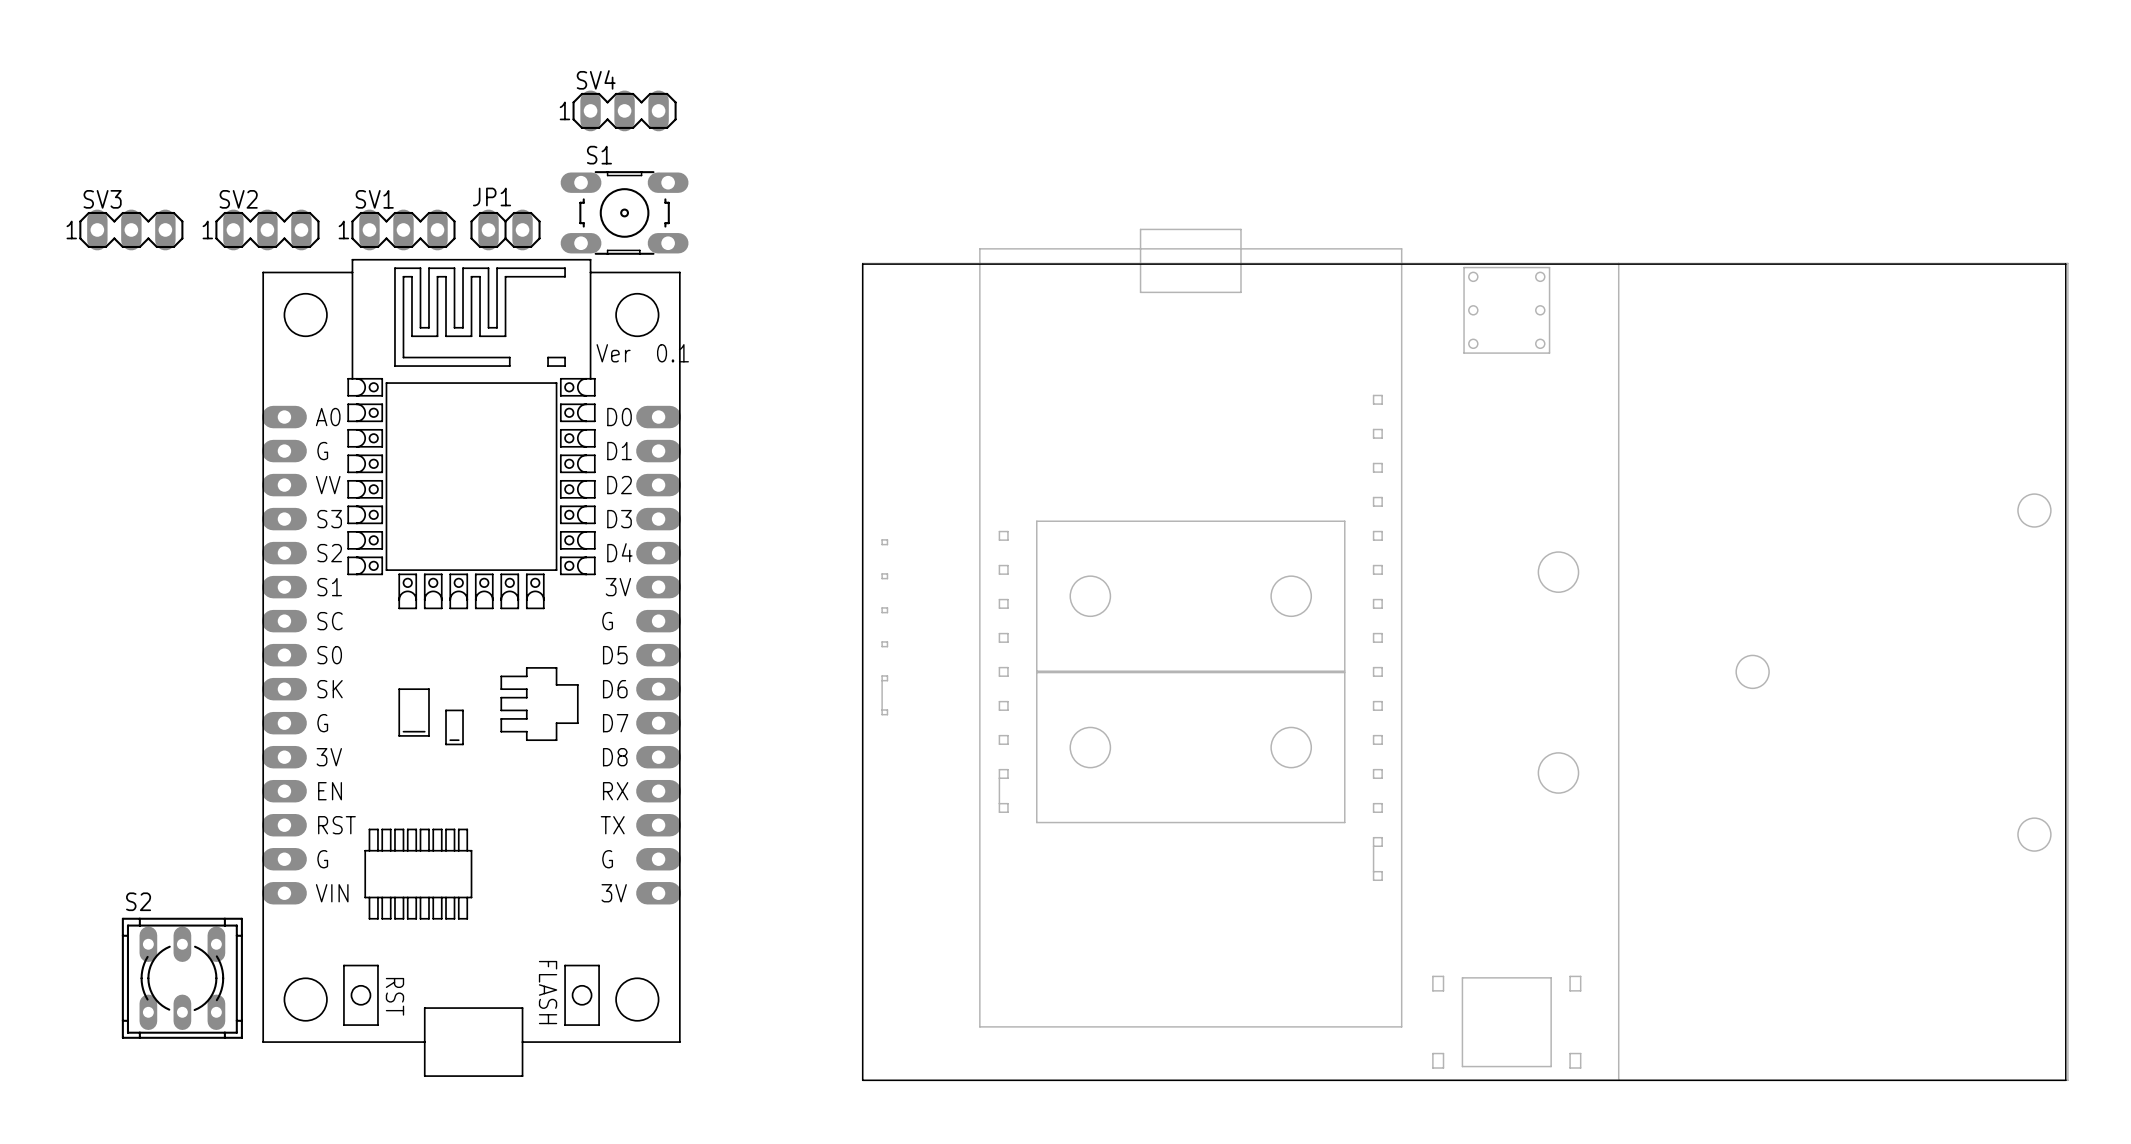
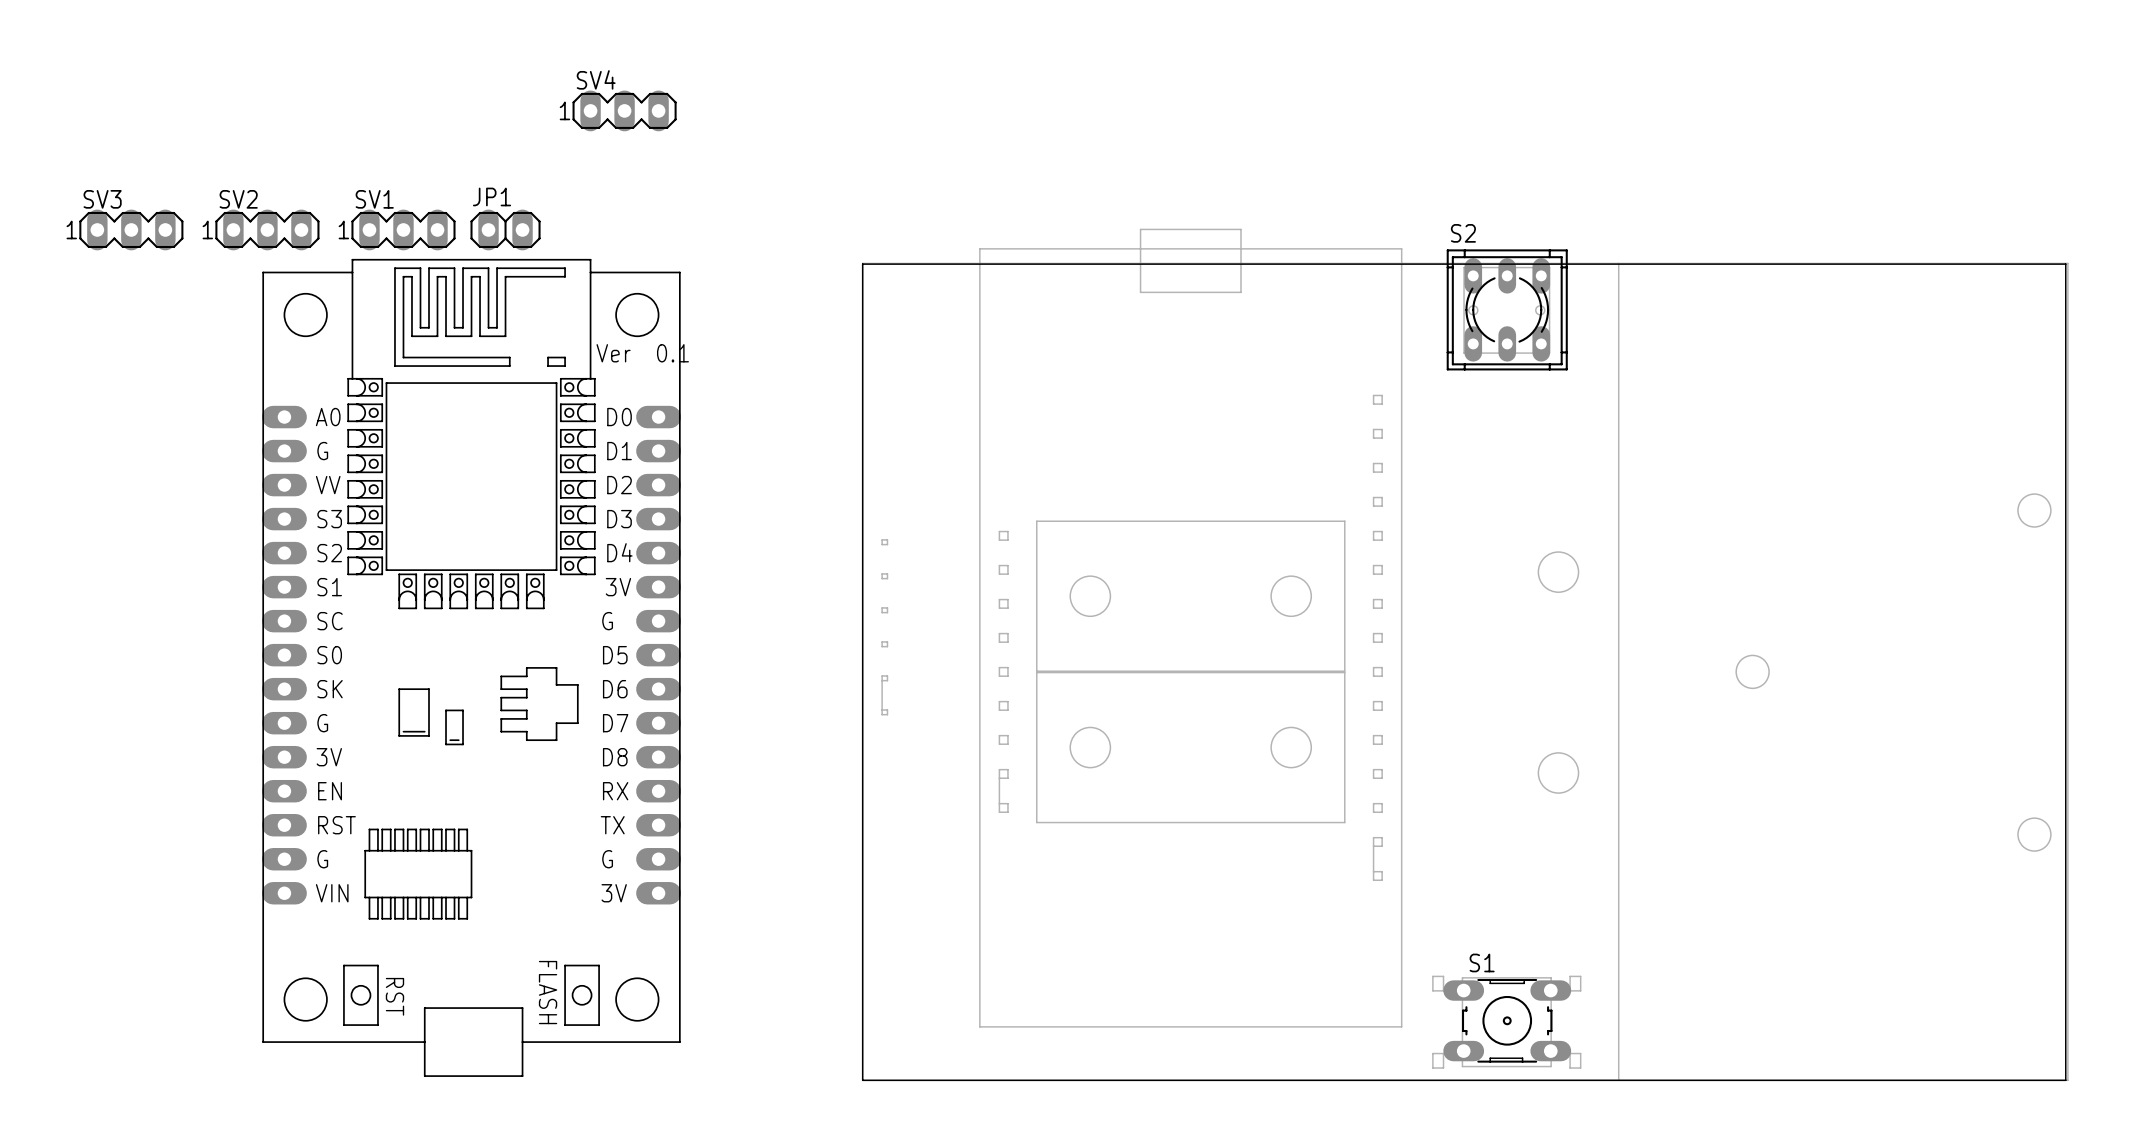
S1 position: (624, 212) -> (1507, 1020)
S2 position: (182, 978) -> (1507, 309)

